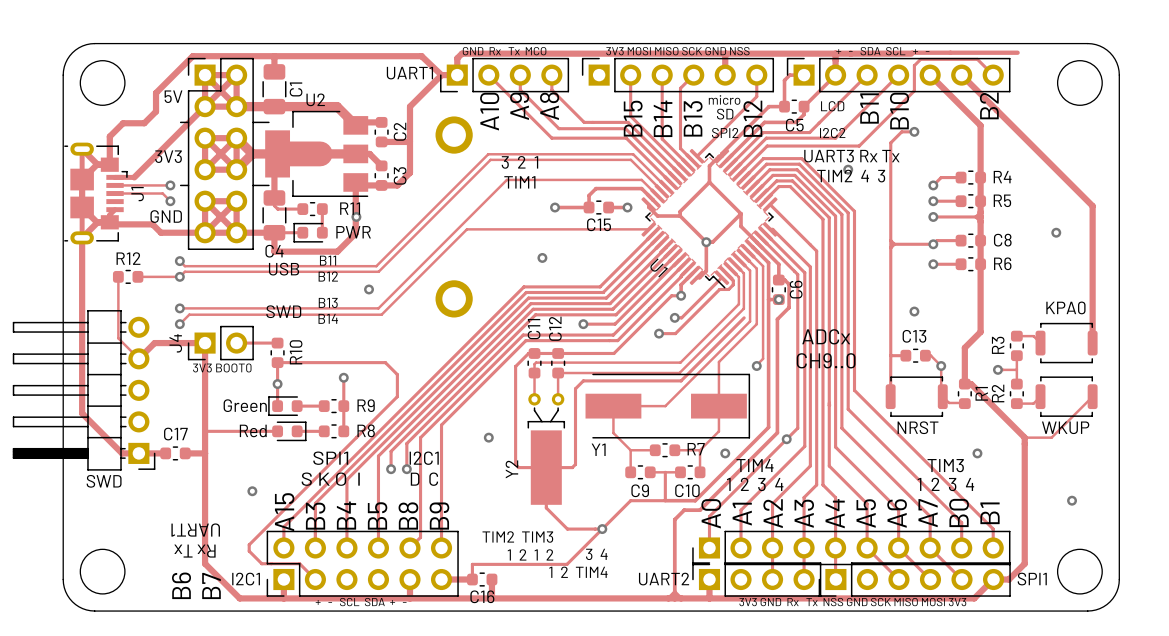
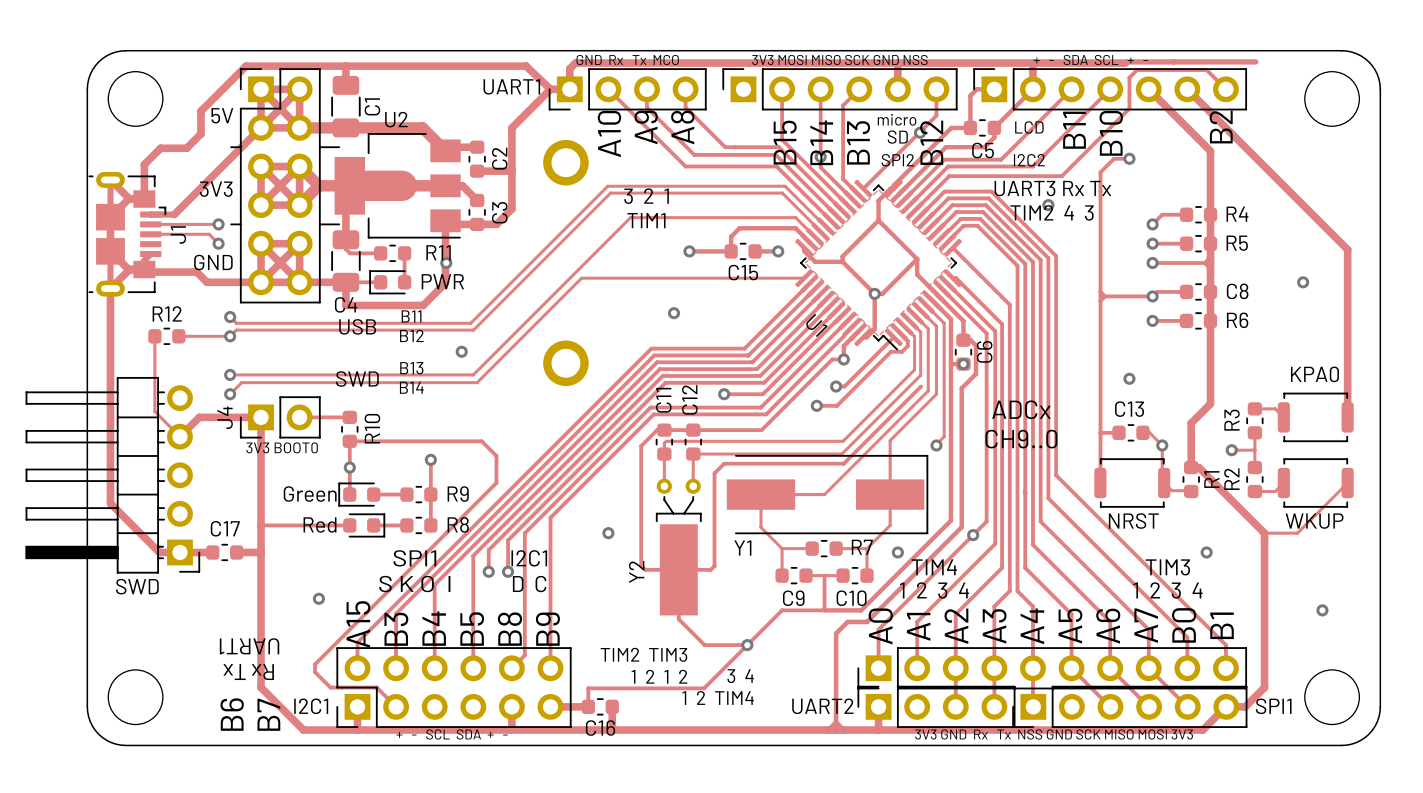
via: none -> (920, 132)
via: none -> (820, 156)

